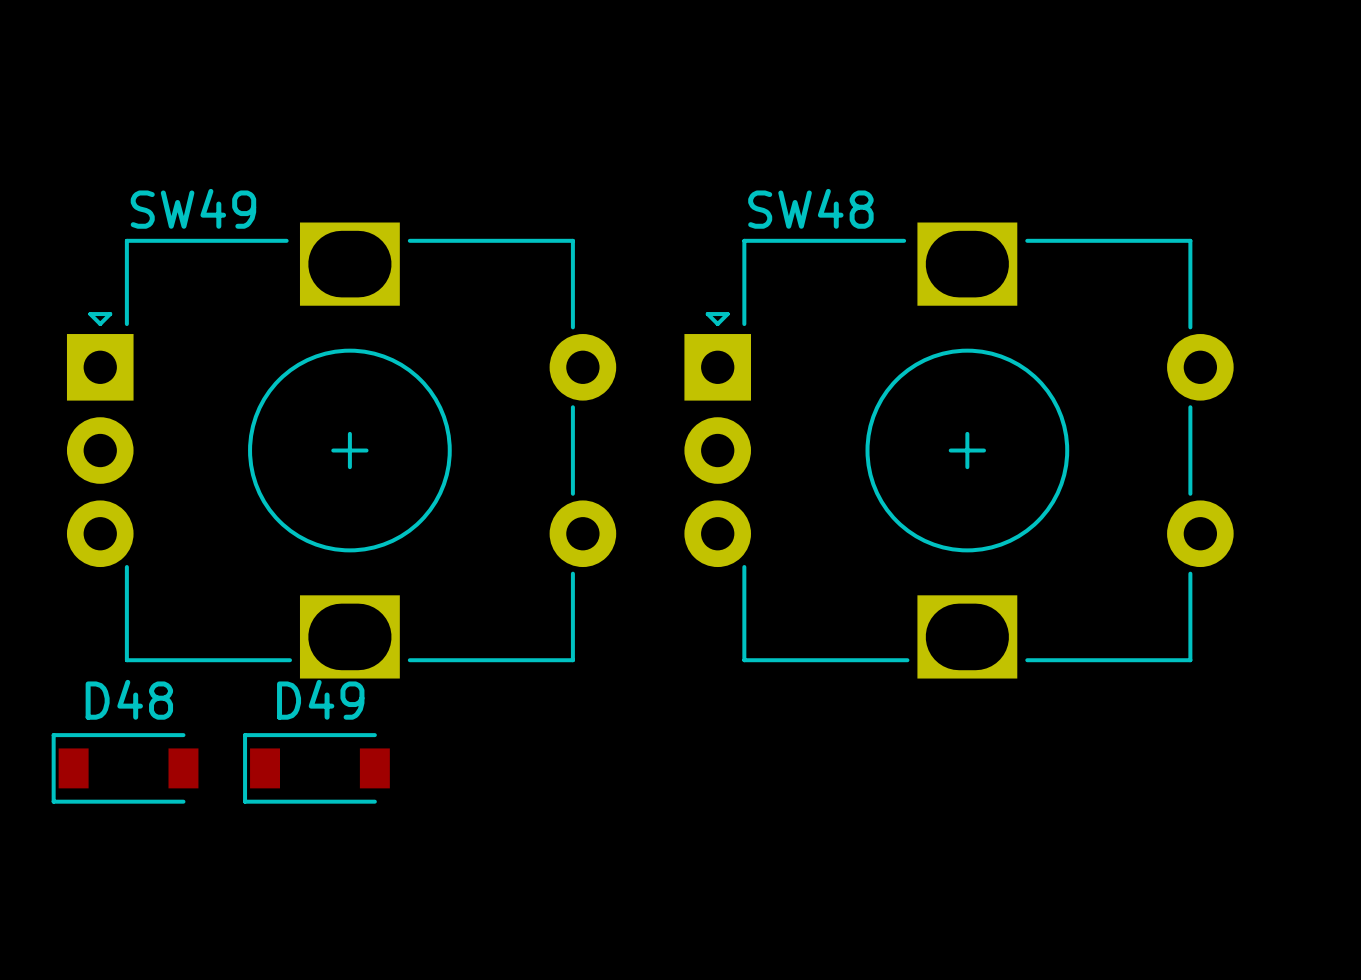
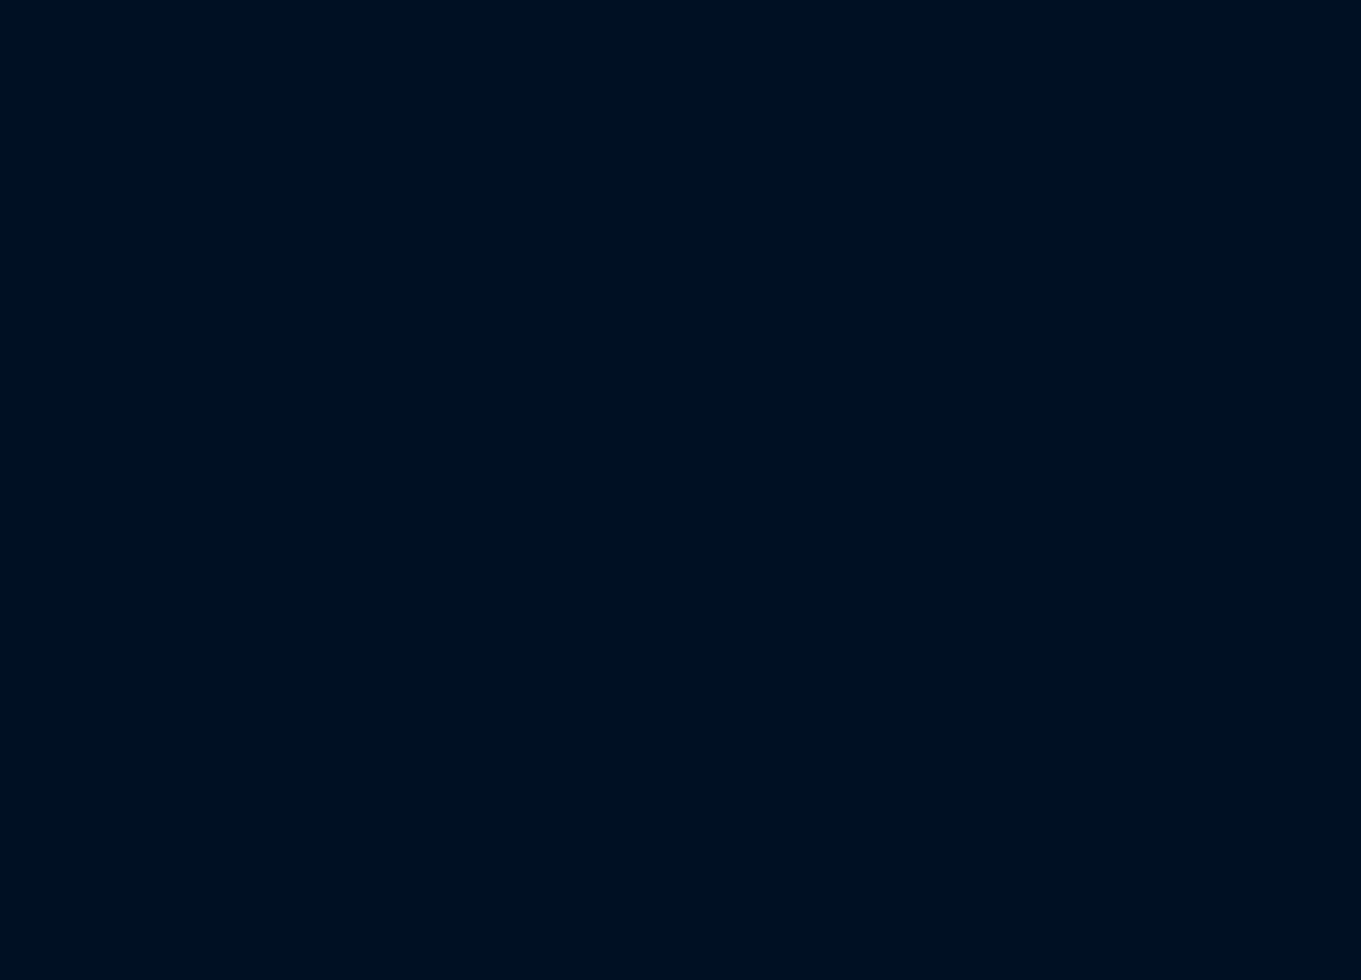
SW49: (341, 450) -> none
SW48: (959, 450) -> none
D48: (125, 768) -> none
D49: (316, 768) -> none

